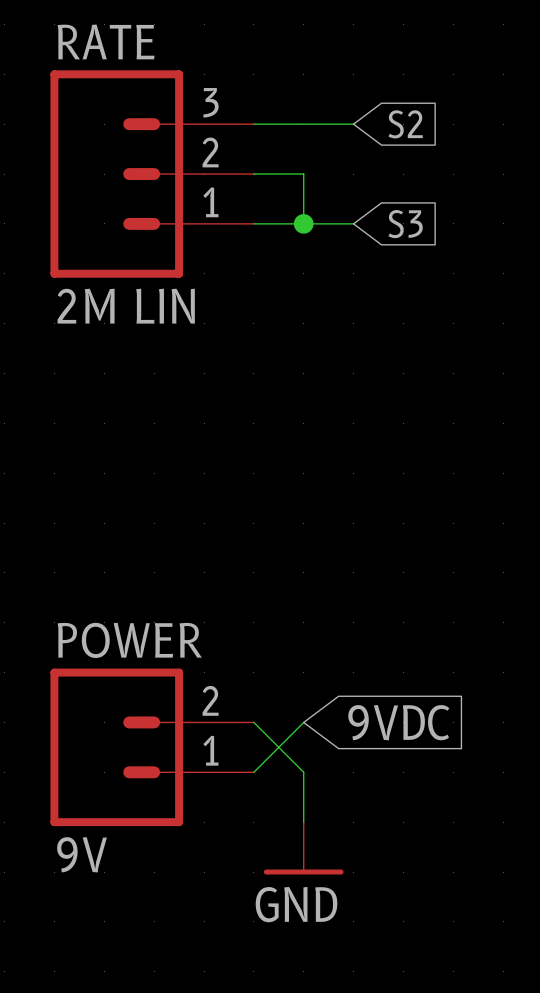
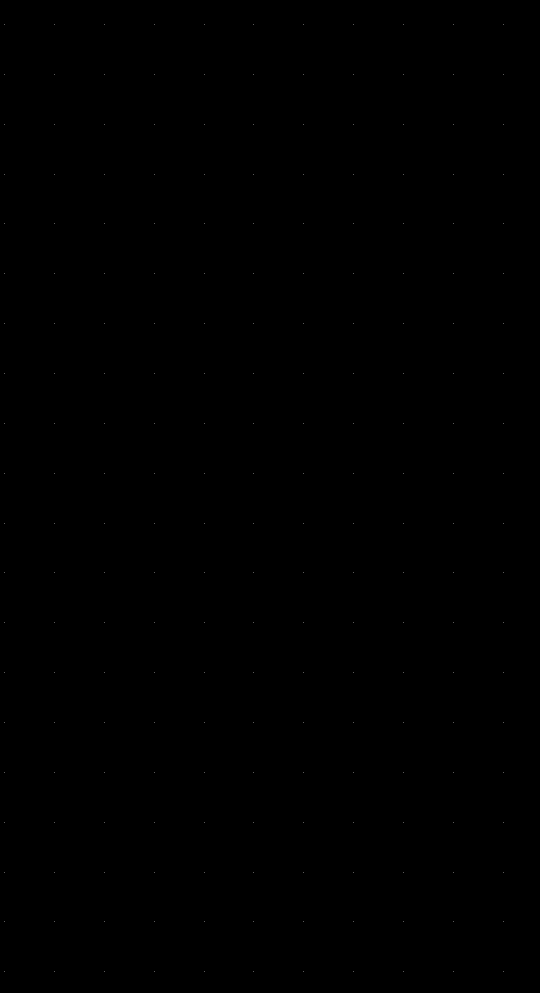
wire: (253, 124) (353, 124) -> none
global label: S2 (405, 124) -> none
RATE: 2M LIN (152, 174) -> none
wire: (253, 174) (303, 174) (303, 223) -> none
wire: (253, 223) (353, 223) -> none
junction: (303, 223) -> none
global label: S3 (405, 224) -> none
wire: (253, 722) (303, 772) (303, 822) -> none
wire: (303, 722) (253, 772) -> none
global label: 9VDC (398, 722) -> none
POWER: 9V (152, 747) -> none
power symbol: GND (303, 848) -> none

